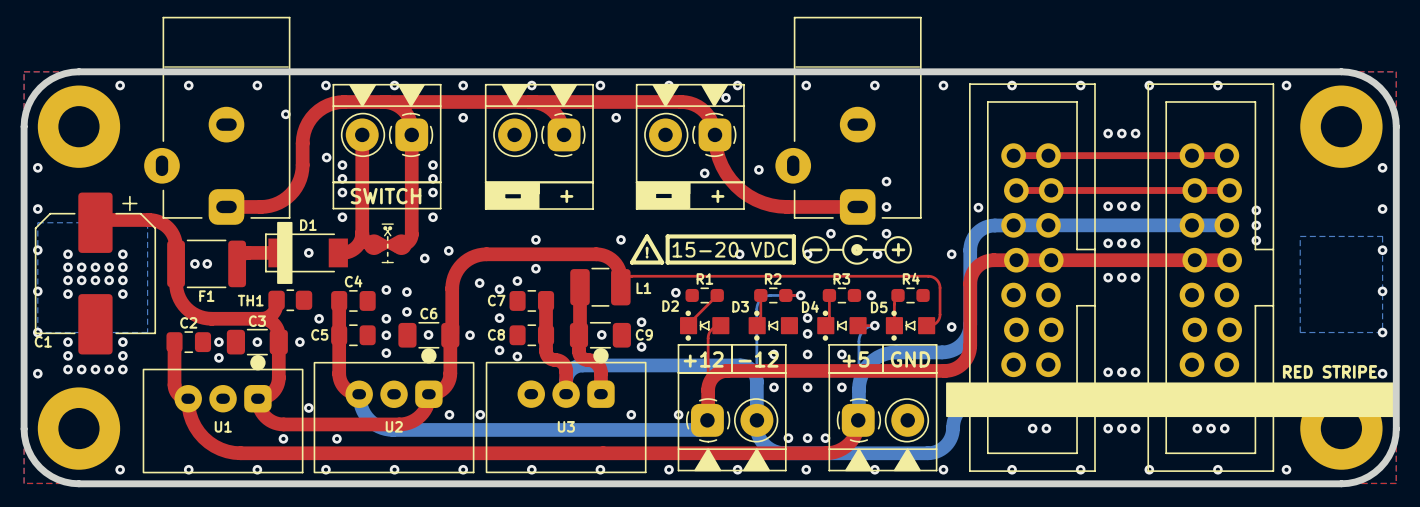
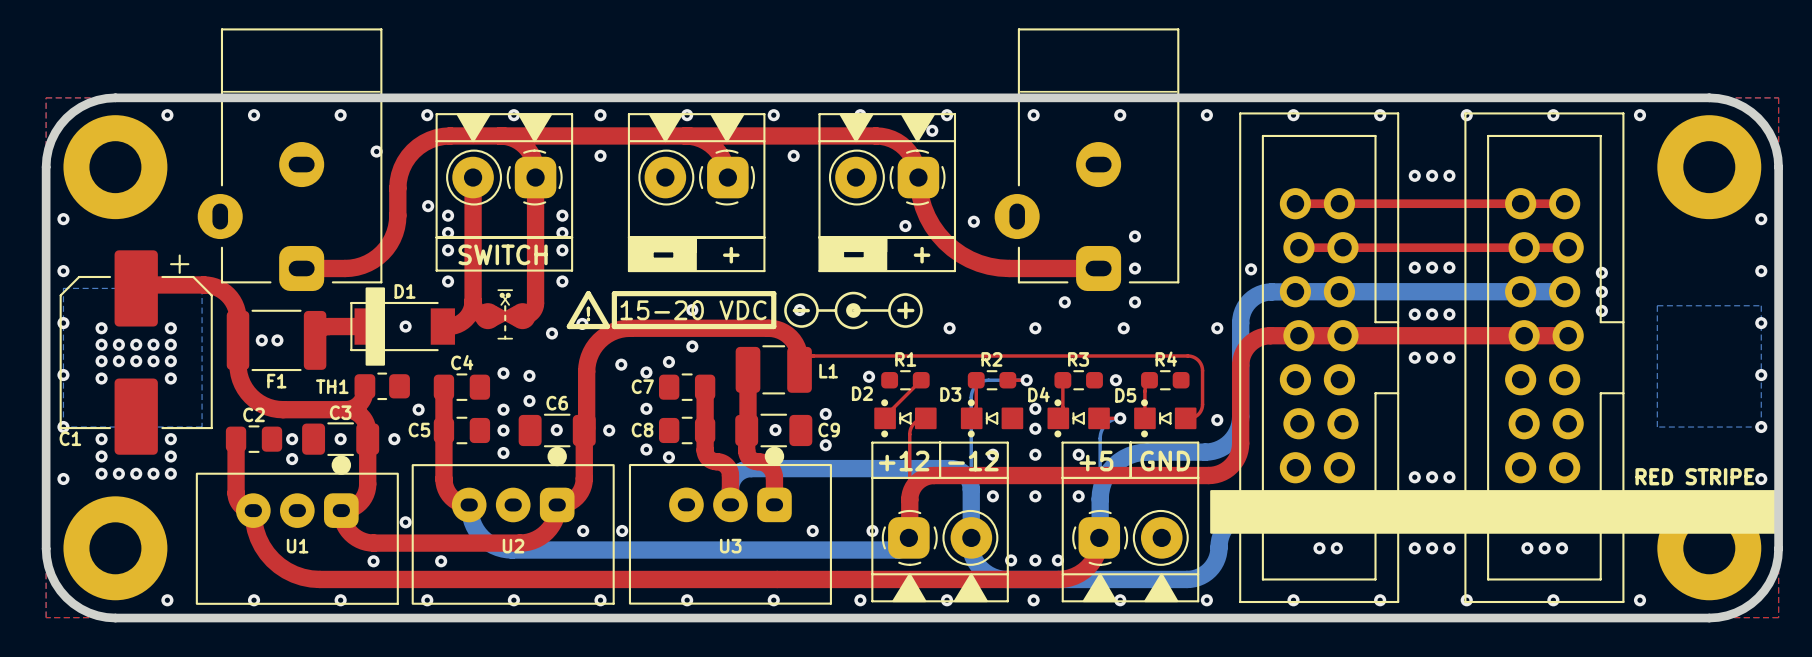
line: (647, 236) (631, 262) (662, 262) (647, 236) -> (588, 293) (569, 326) (607, 326) (588, 293)
line: (667, 236) (793, 236) (793, 262) (667, 262) (667, 236) -> (614, 293) (773, 293) (773, 326) (614, 326) (614, 293)
text position: 15-20 VDC (730, 249) -> 15-20 VDC (693, 310)
drawing position: (857, 249) -> (853, 310)
text position: ! (647, 252) -> ! (588, 313)

